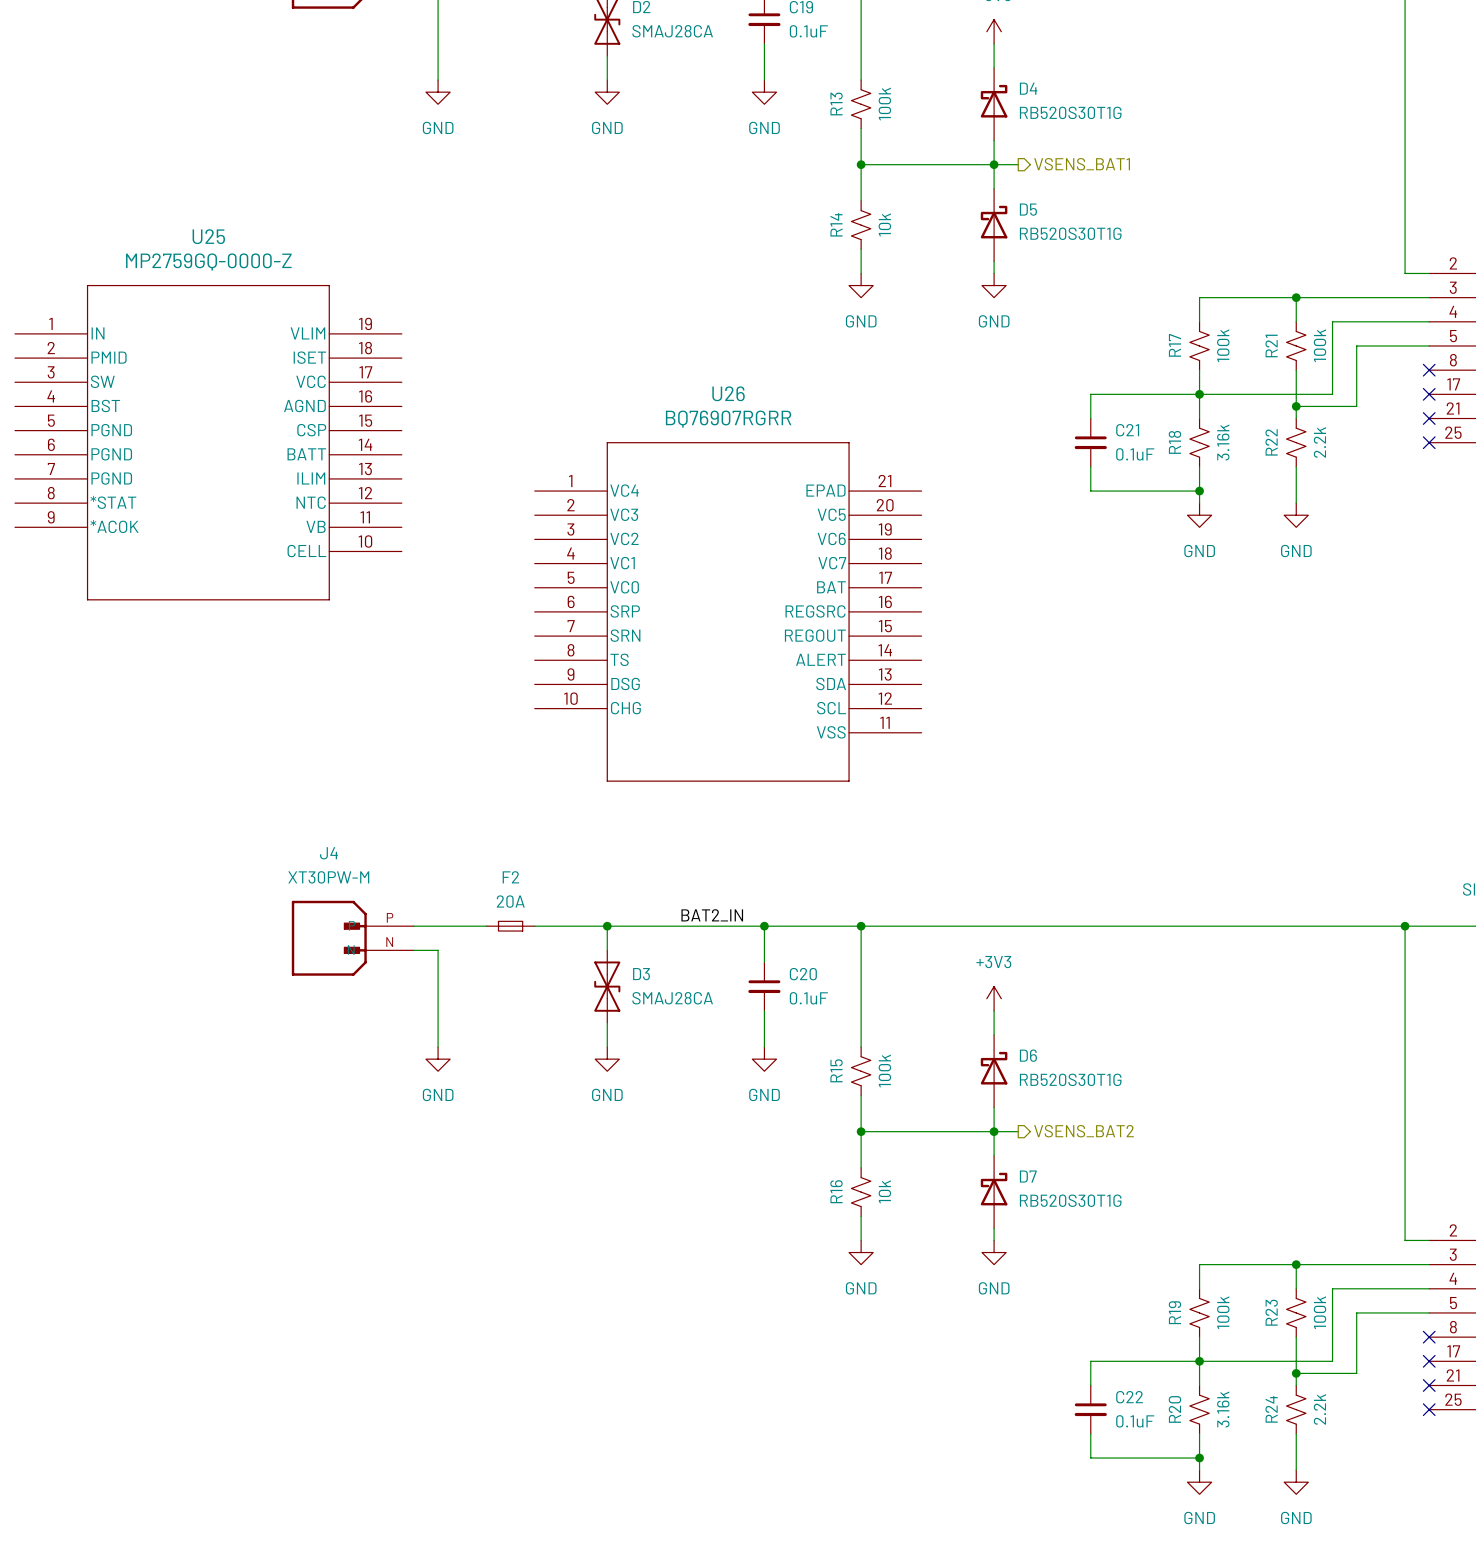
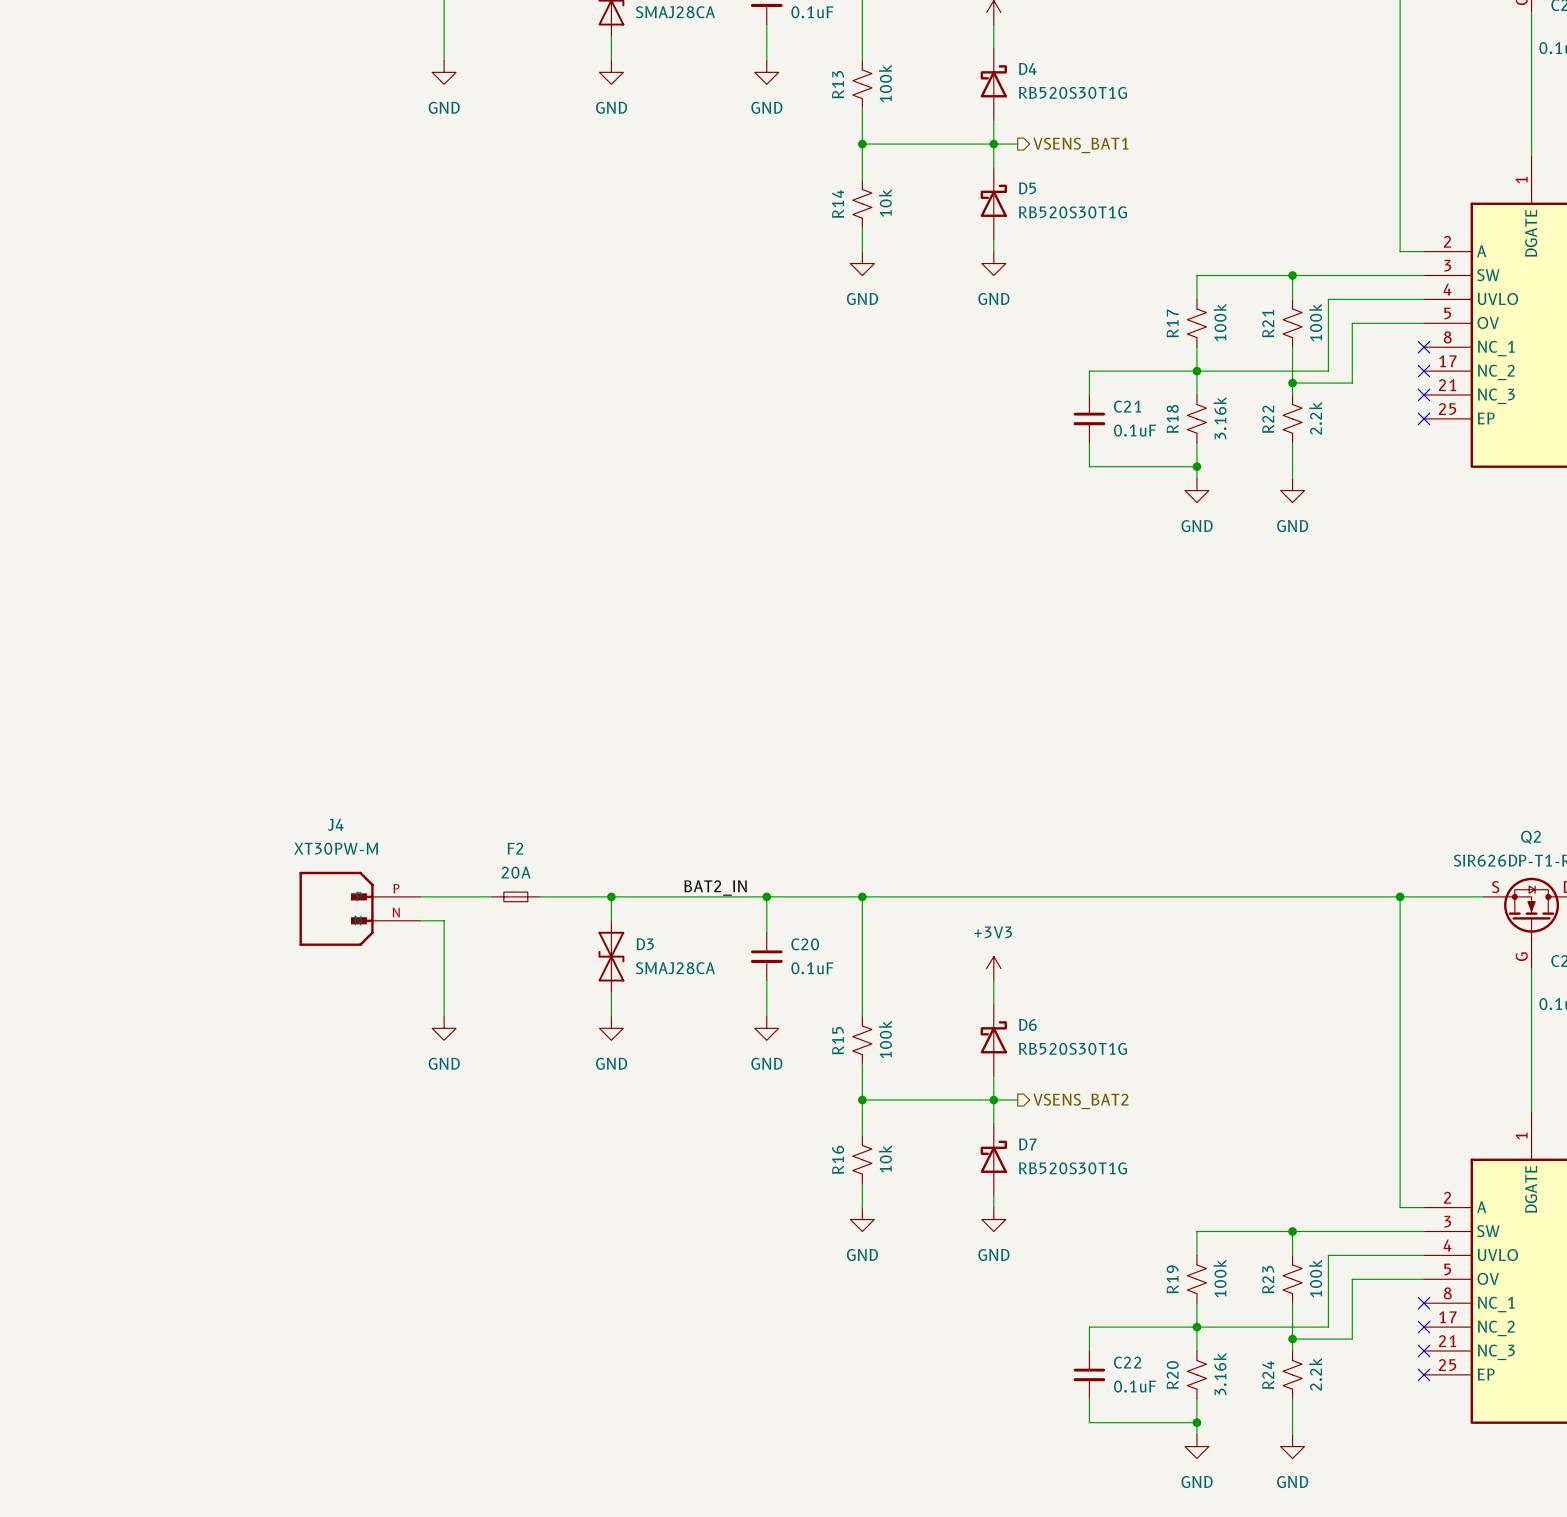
U25: MP2759GQ-0000-Z (208, 442) -> none
U26: BQ76907RGRR (728, 611) -> none

